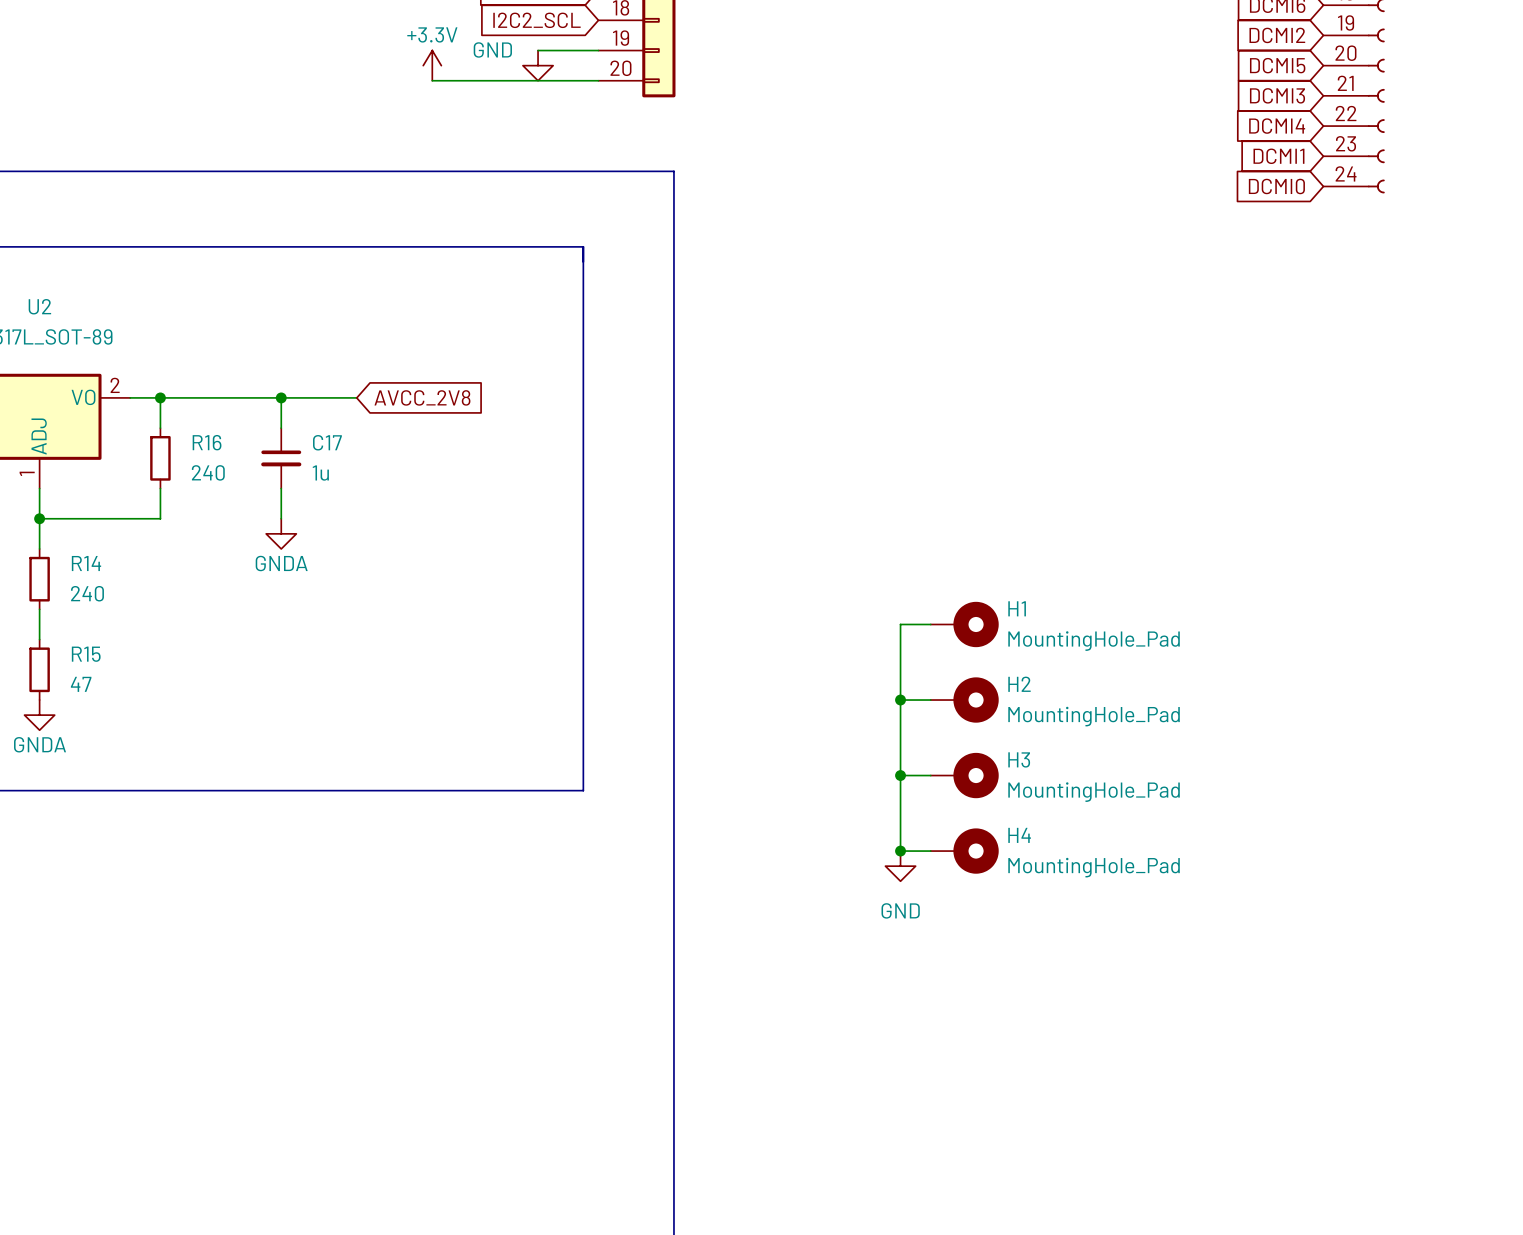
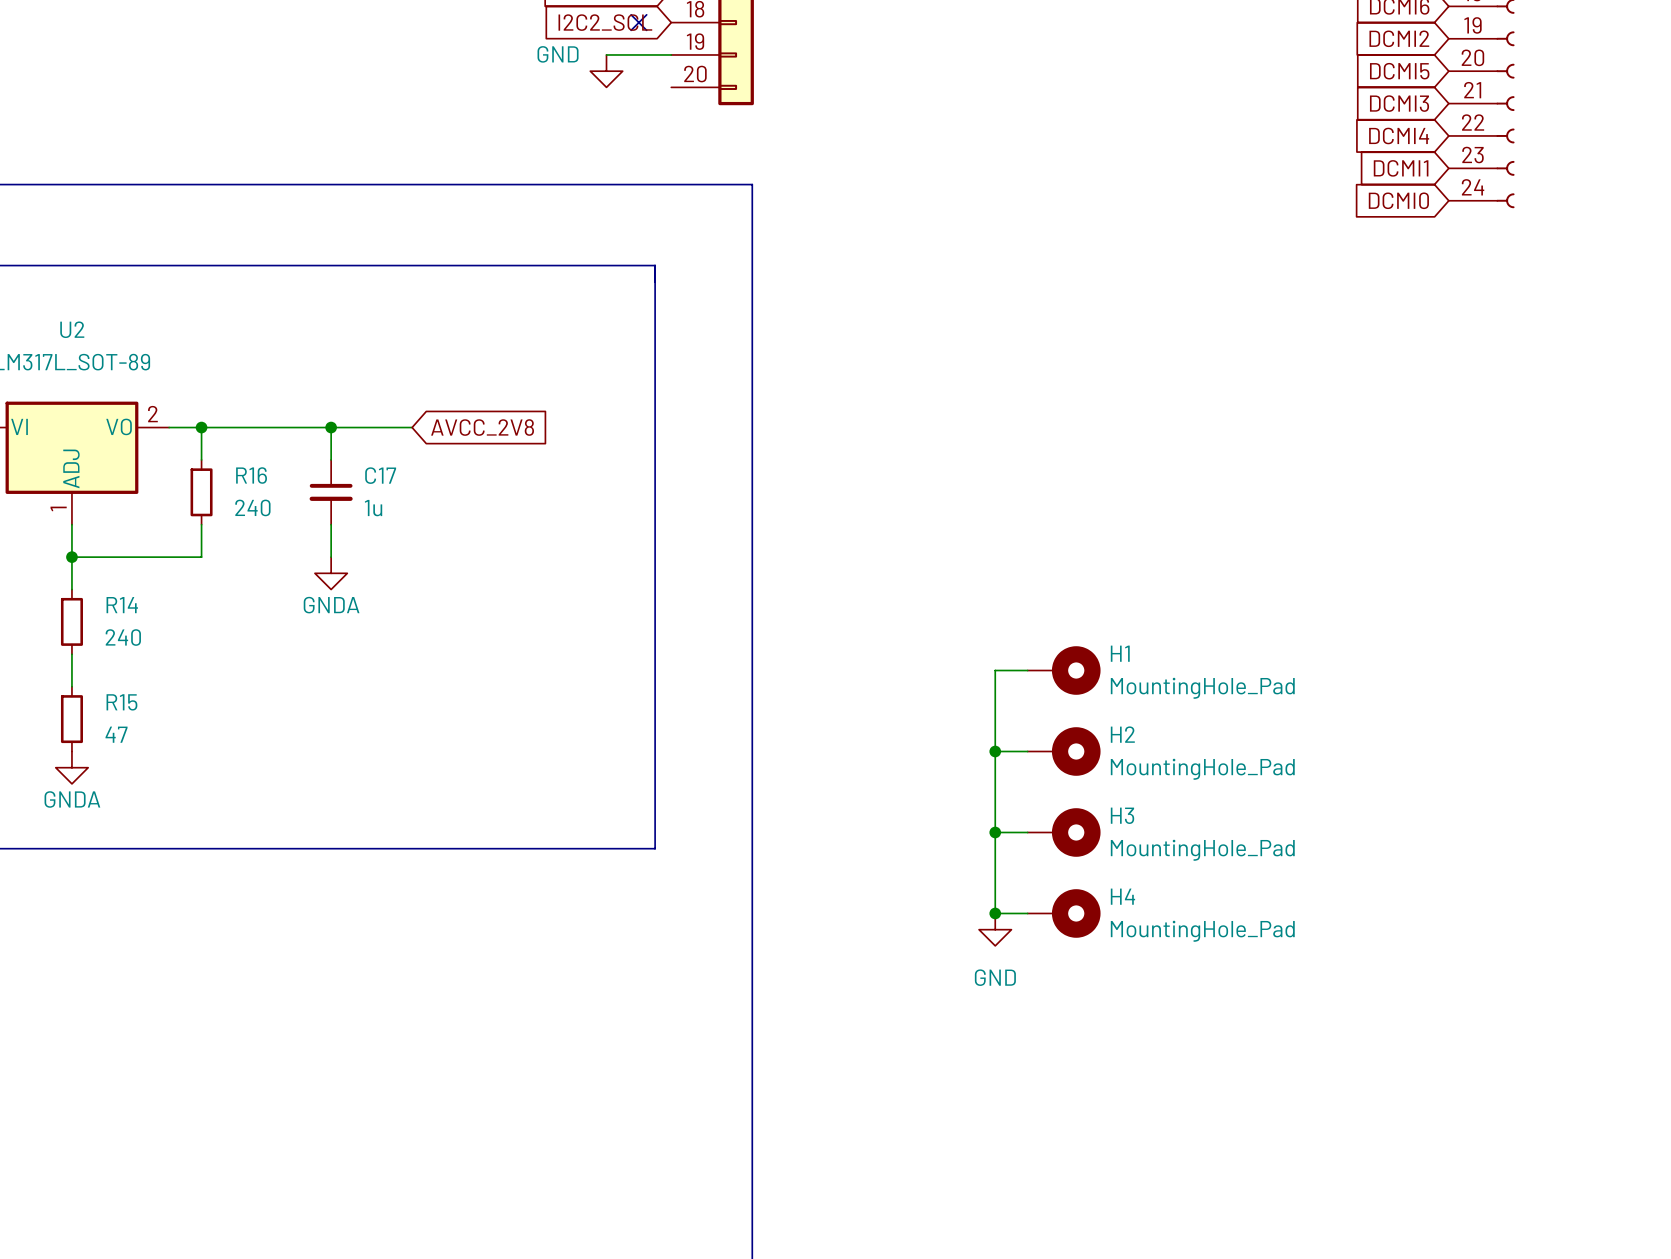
no-connect mark: none -> (638, 22)
power symbol: +3.3V (432, 65) -> none
wire: (432, 80) (598, 80) -> none

